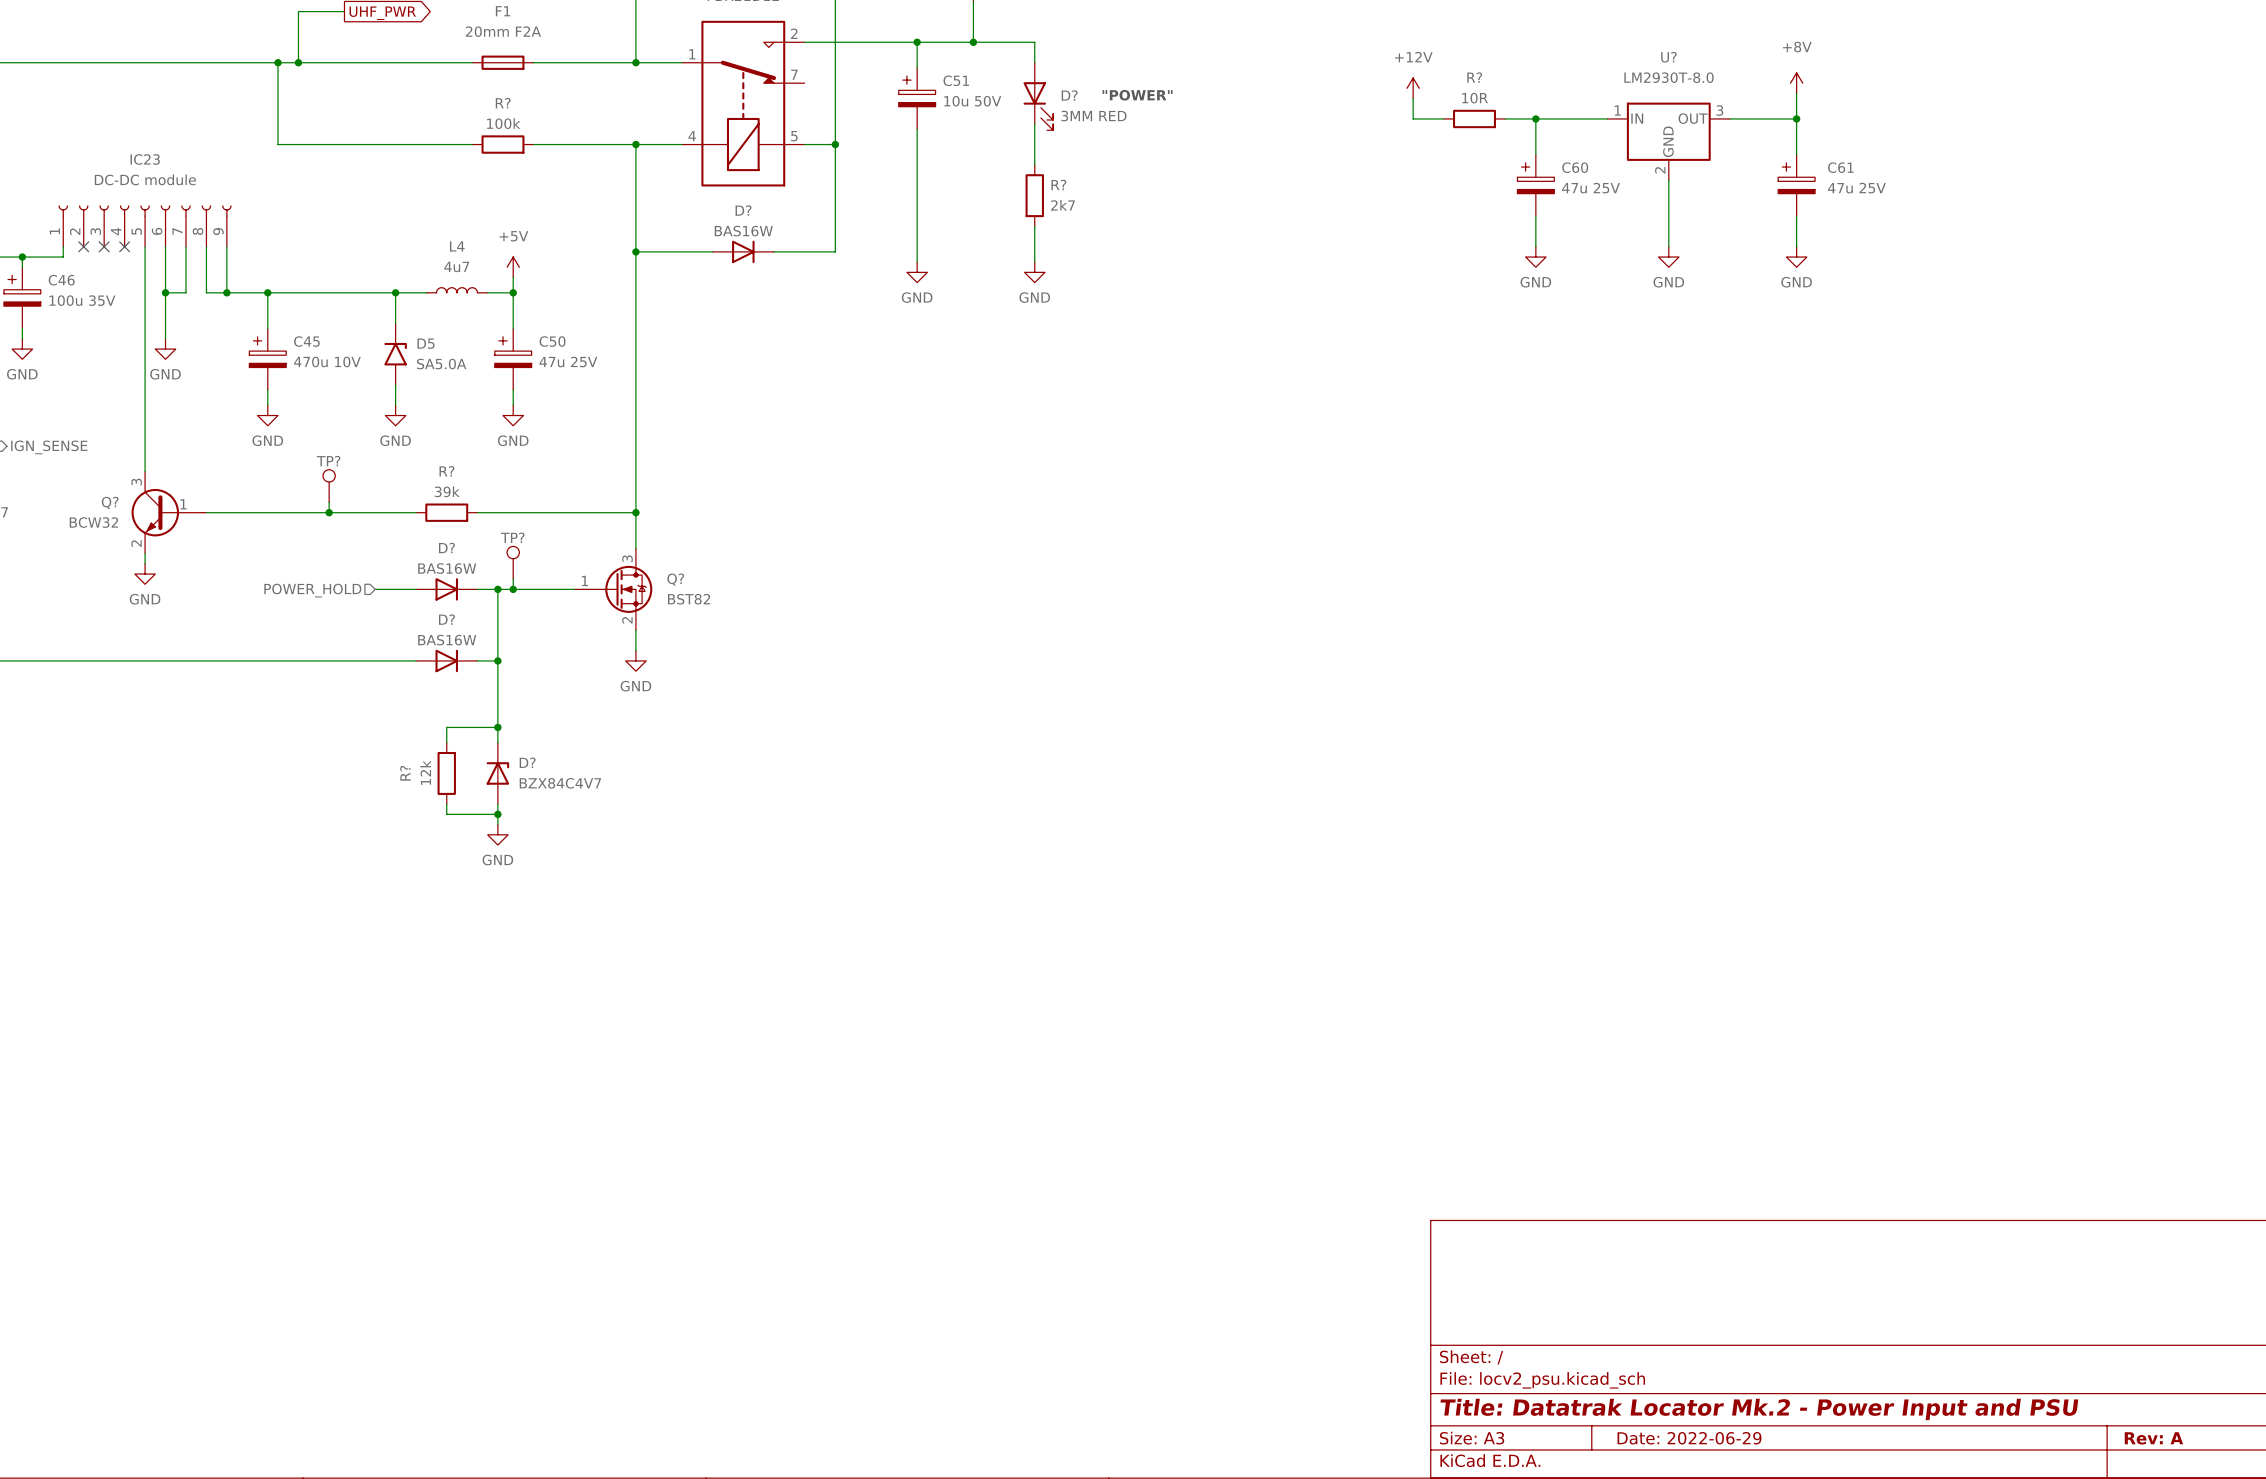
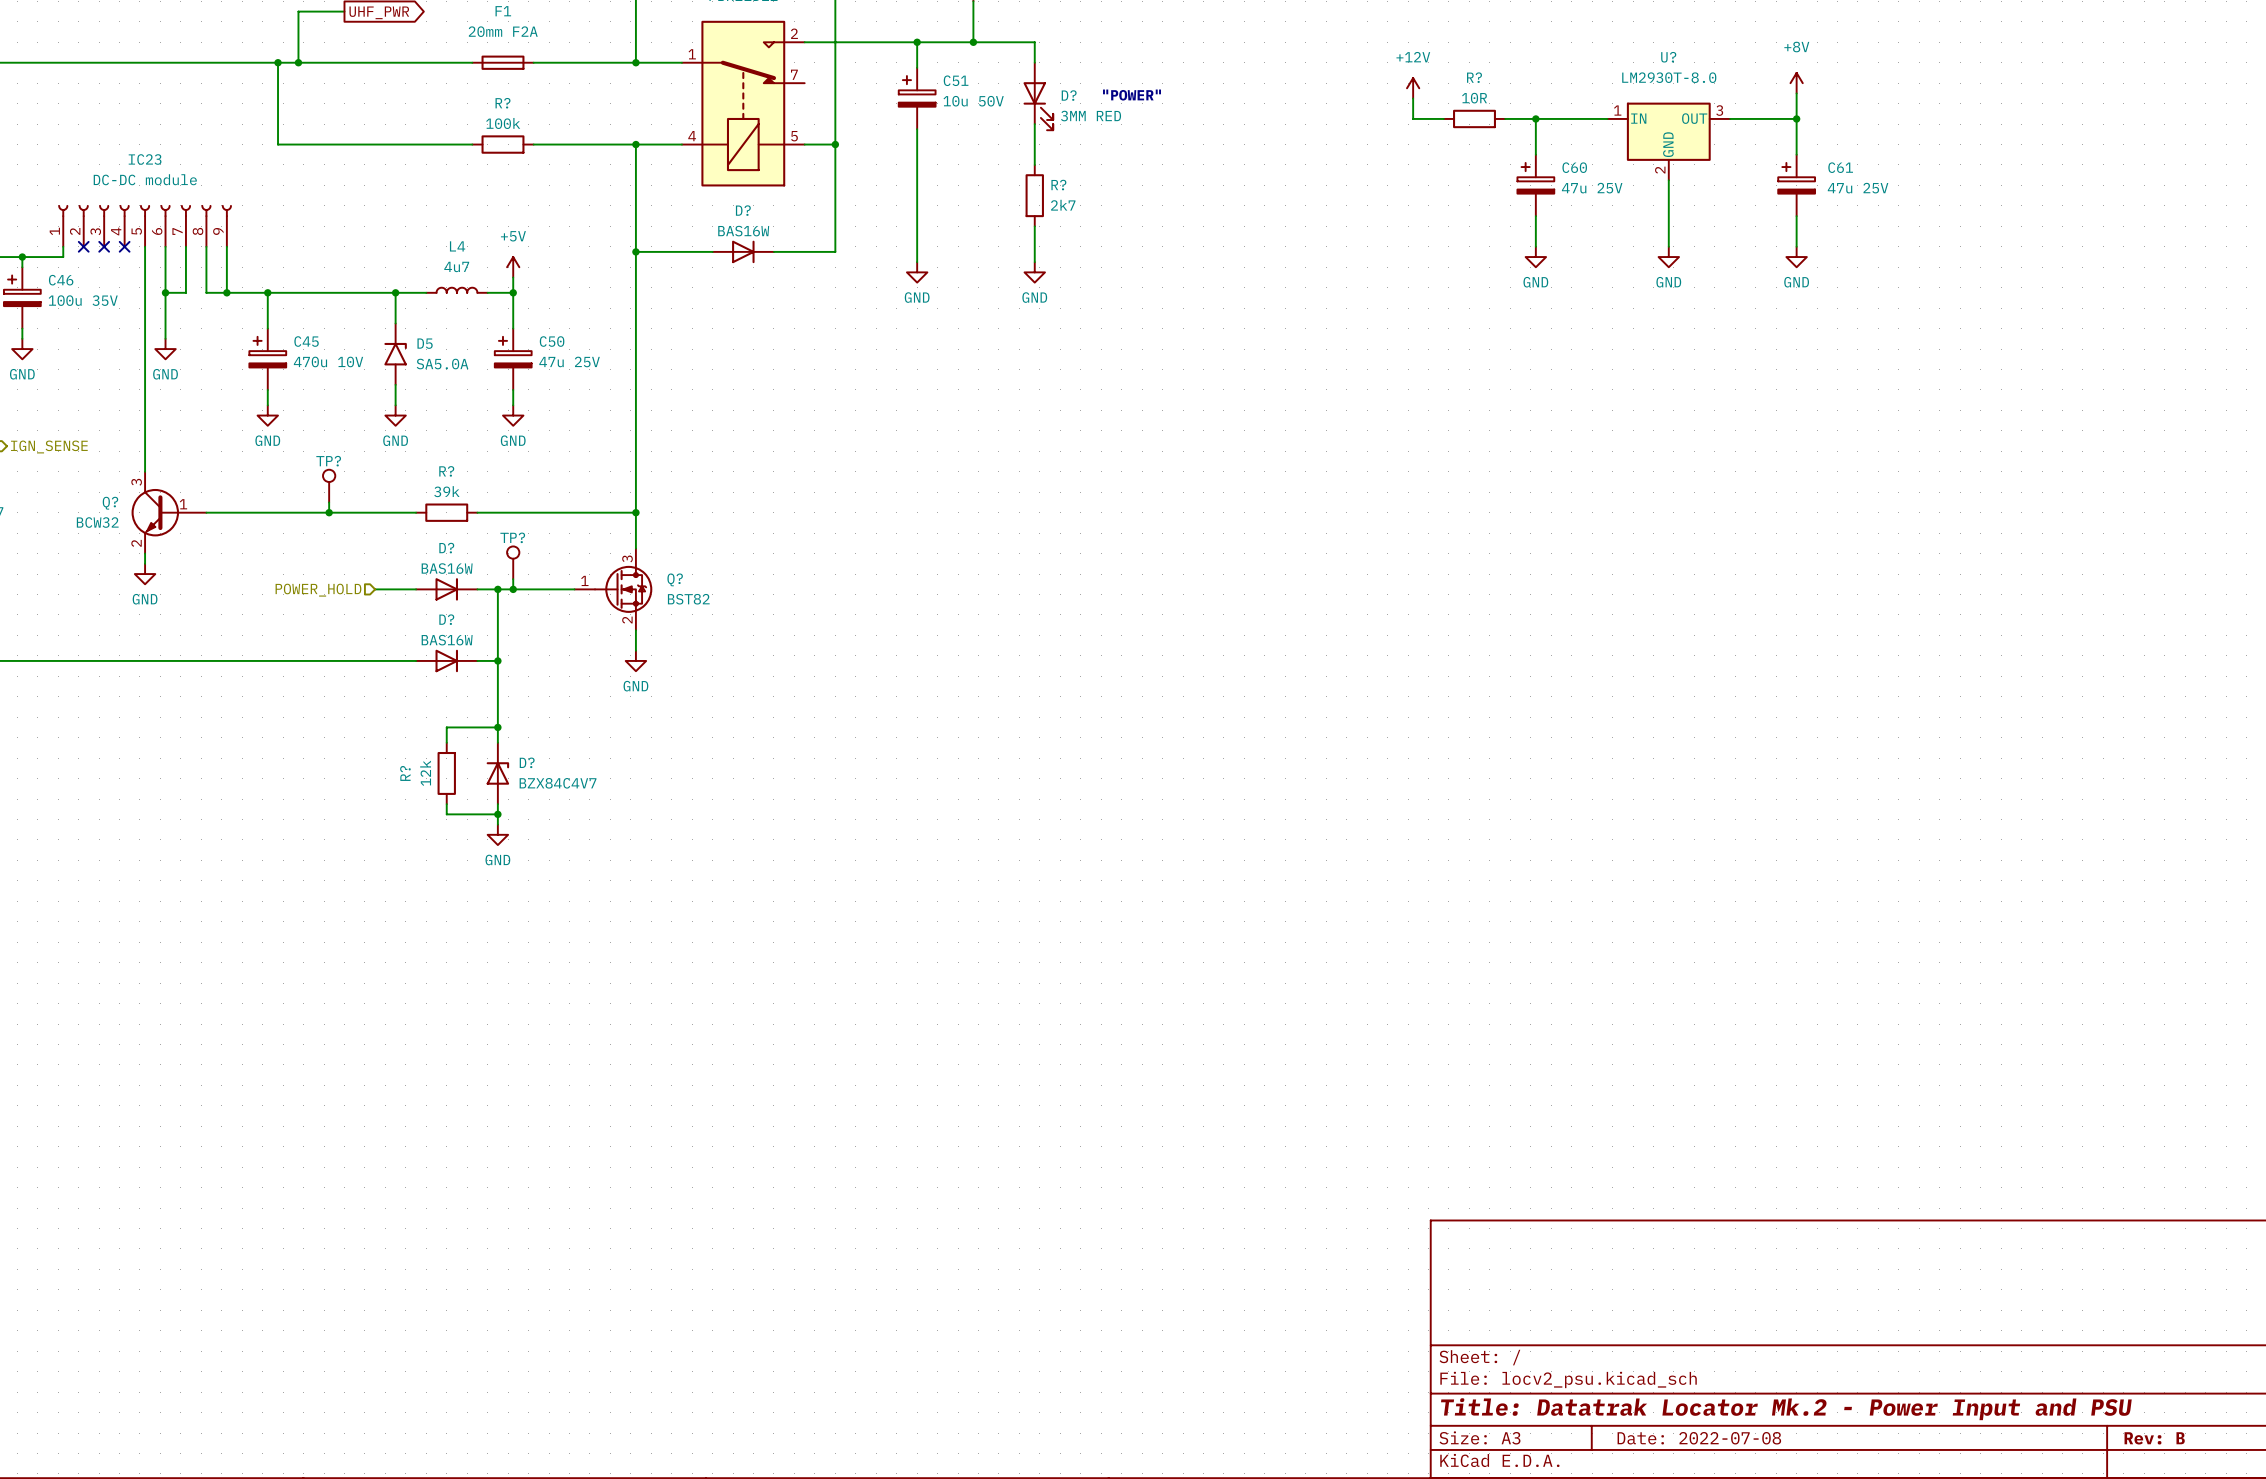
title block: Date: 2022-06-29 (1689, 1438) -> Date: 2022-07-08 (1699, 1438)
title block: Rev: A (2153, 1438) -> Rev: B (2154, 1438)

